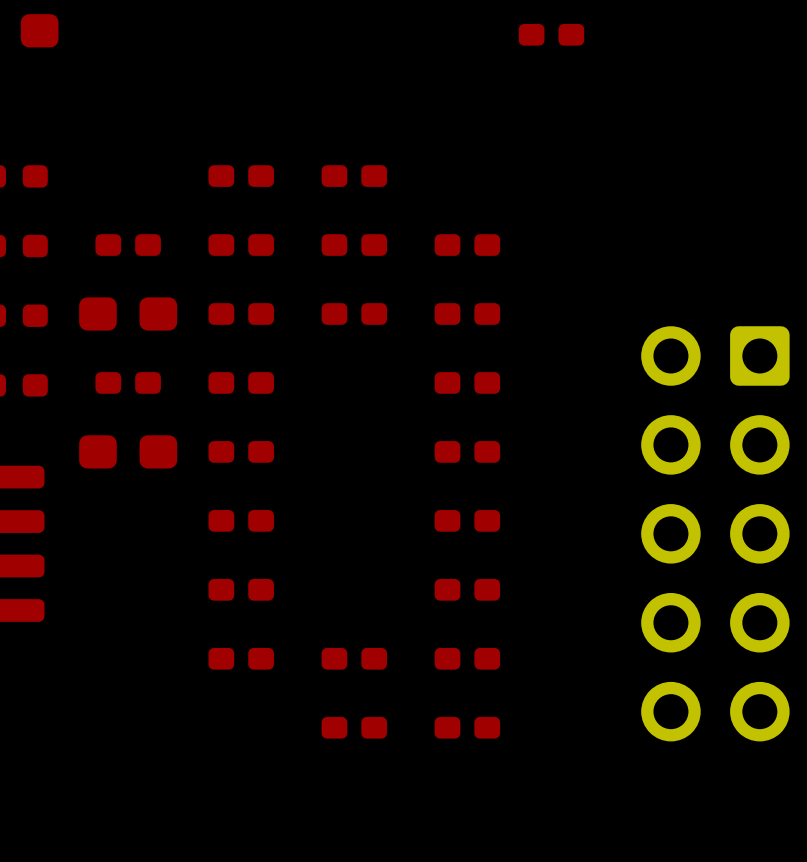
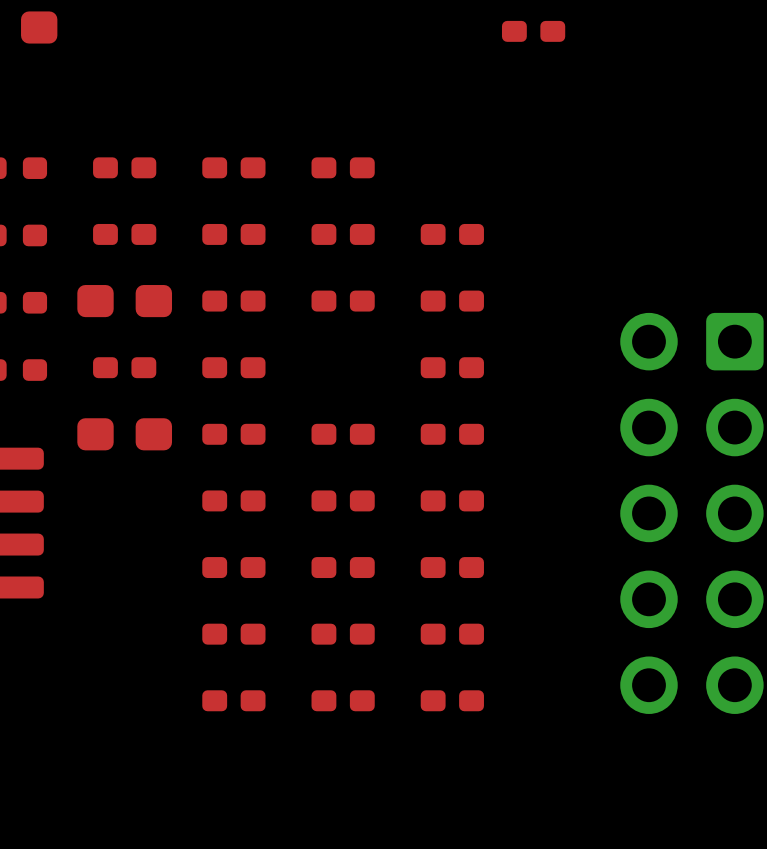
part: none -> (124, 167)
part: none -> (343, 434)
part: none -> (343, 500)
part: none -> (343, 567)
part: none -> (233, 700)

